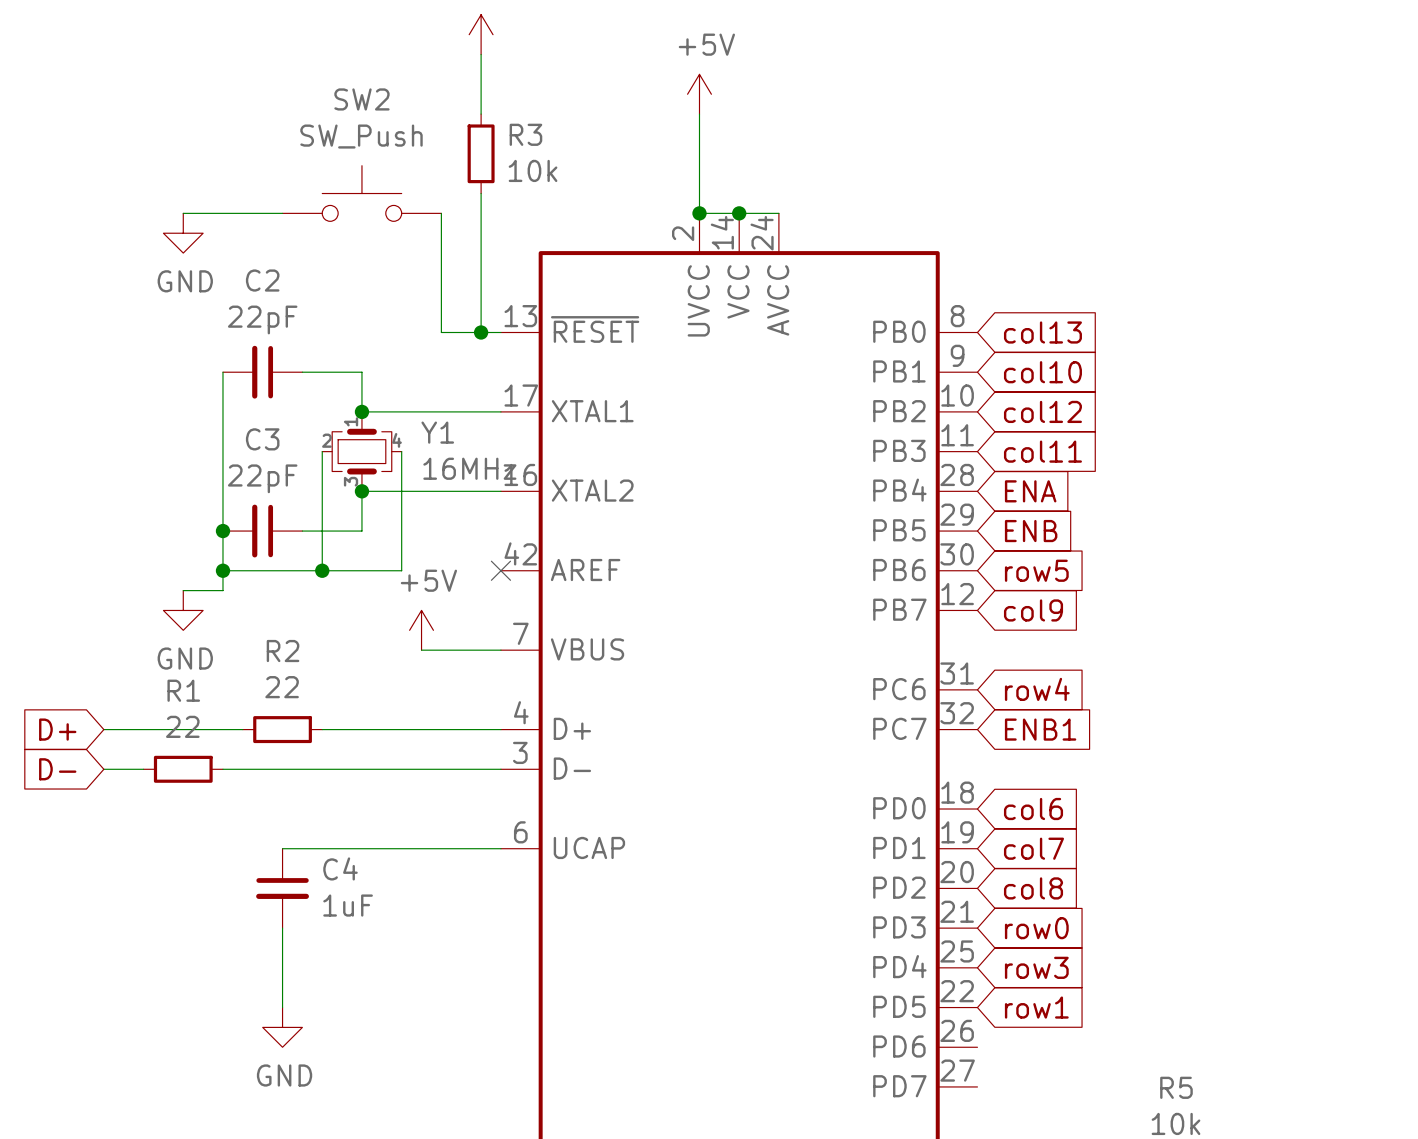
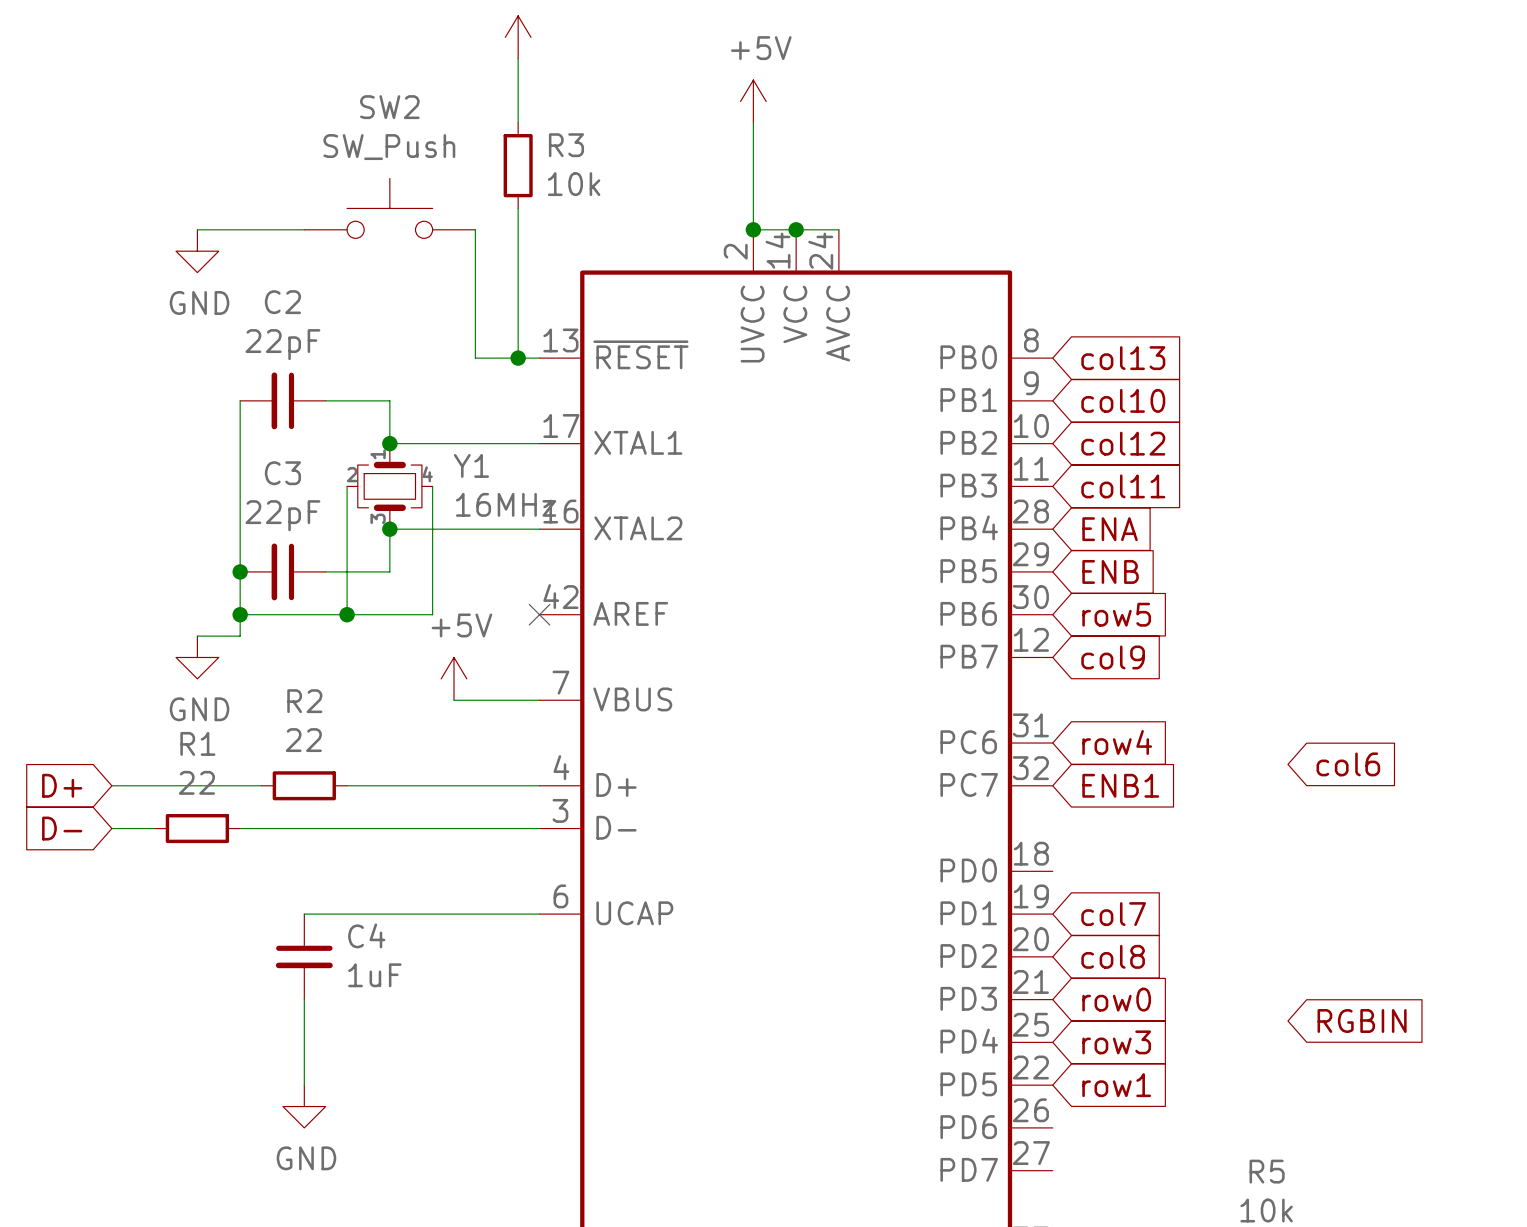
global label position: col6 (1033, 809) -> col6 (1348, 764)
global label: none -> RGBIN (1362, 1021)

